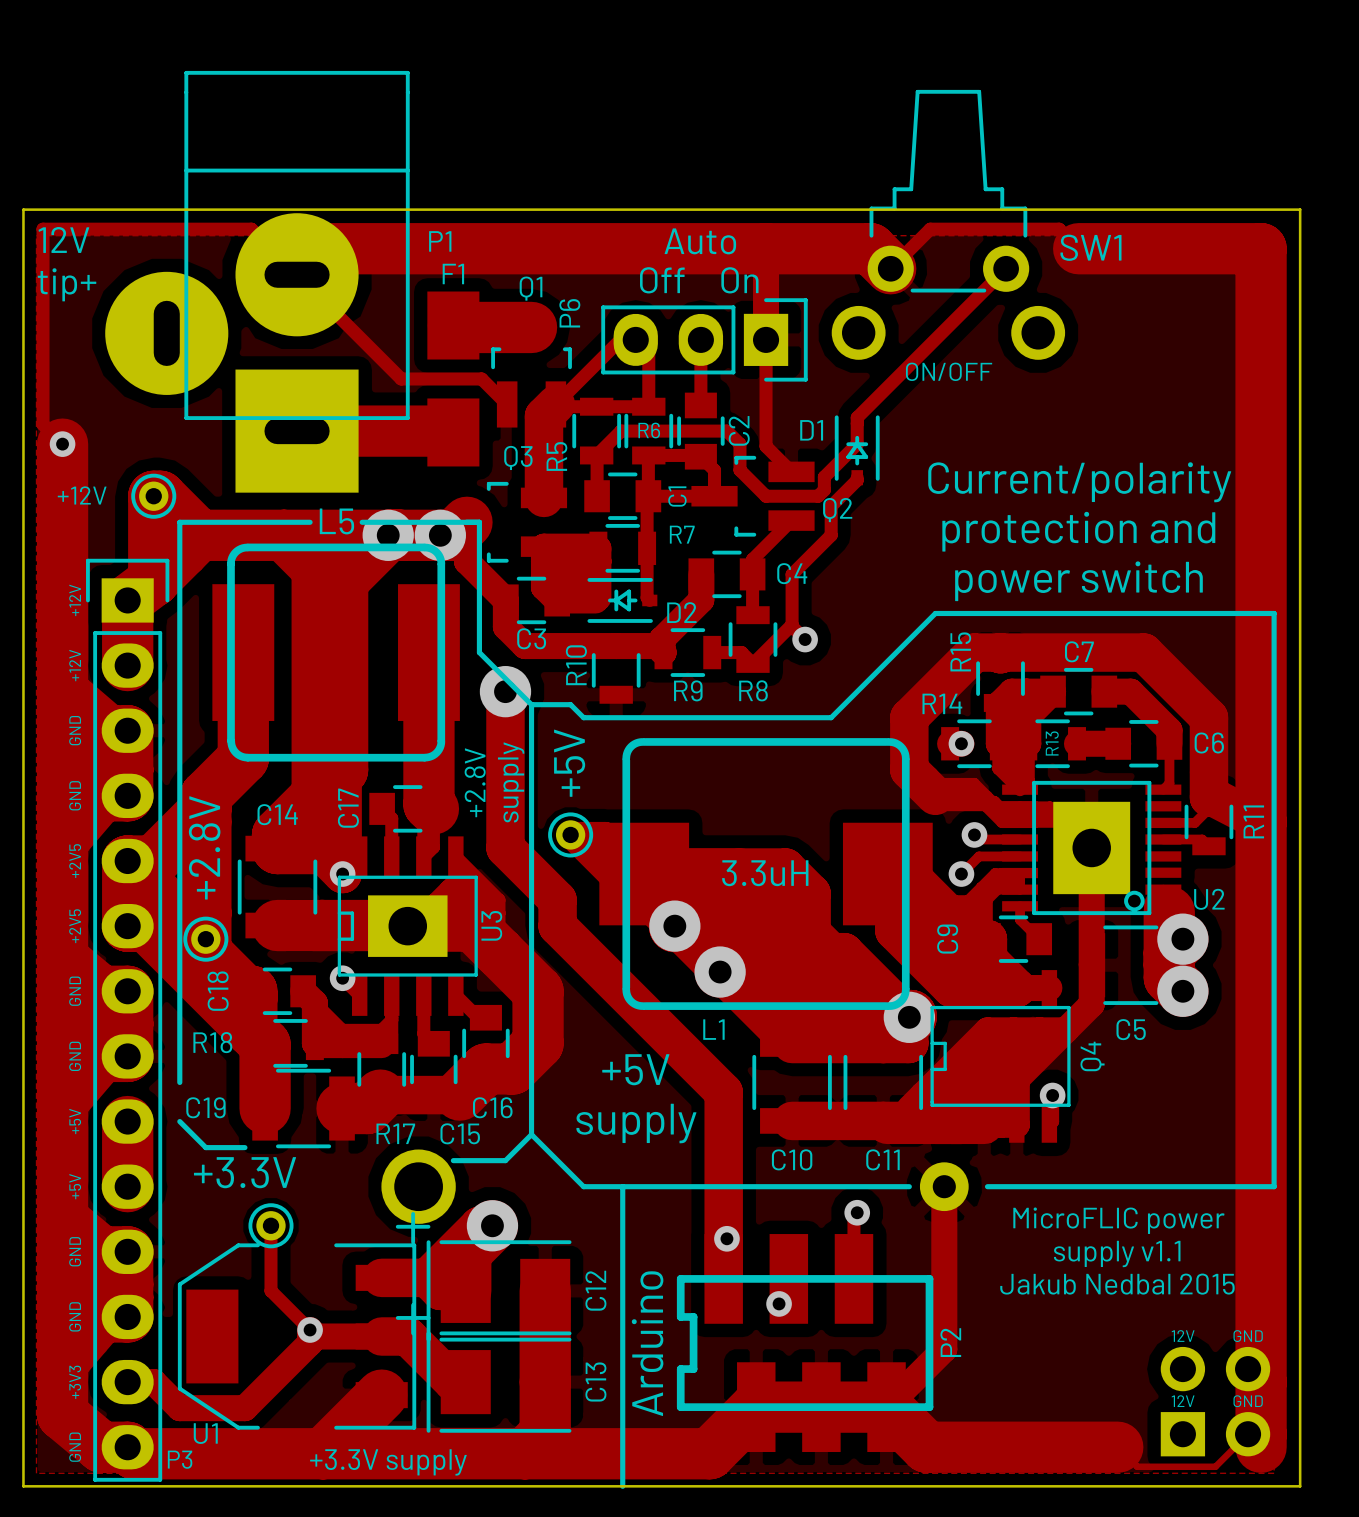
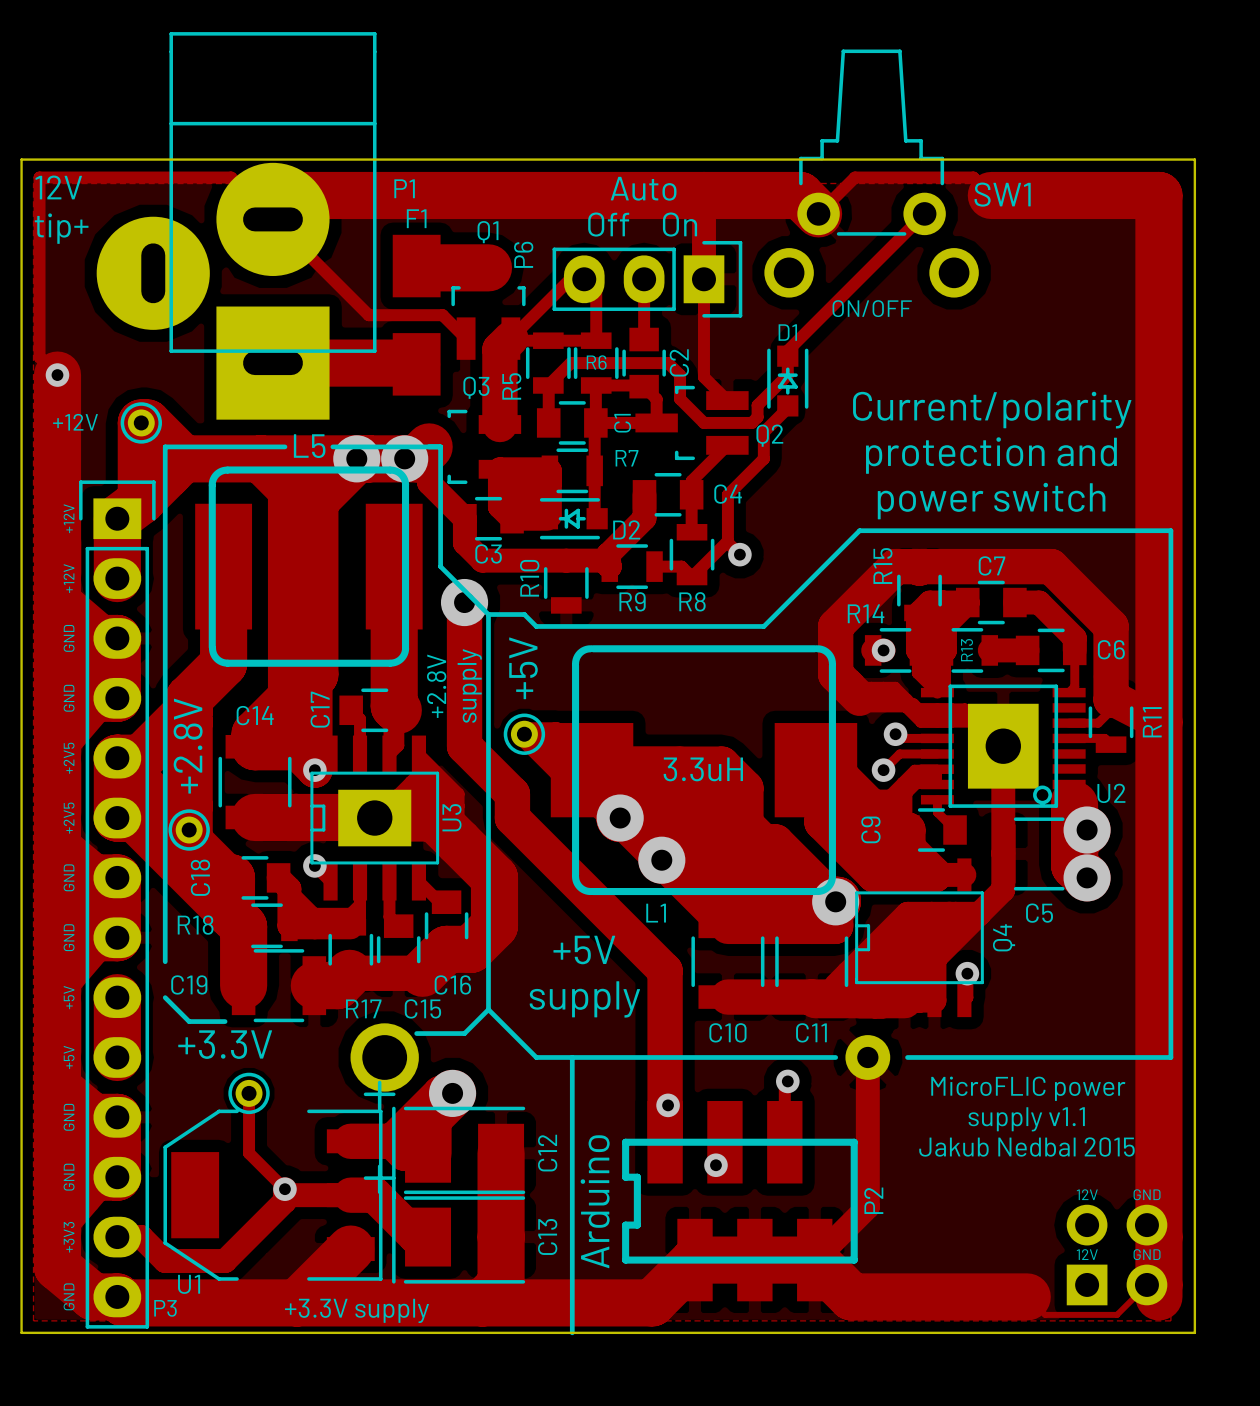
D1 footprint: [834, 415, 880, 486] -> [767, 345, 809, 417]
D1 name position: D1 (811, 430) -> D1 (787, 332)
D2 footprint: [587, 578, 658, 623] -> [536, 498, 608, 540]

